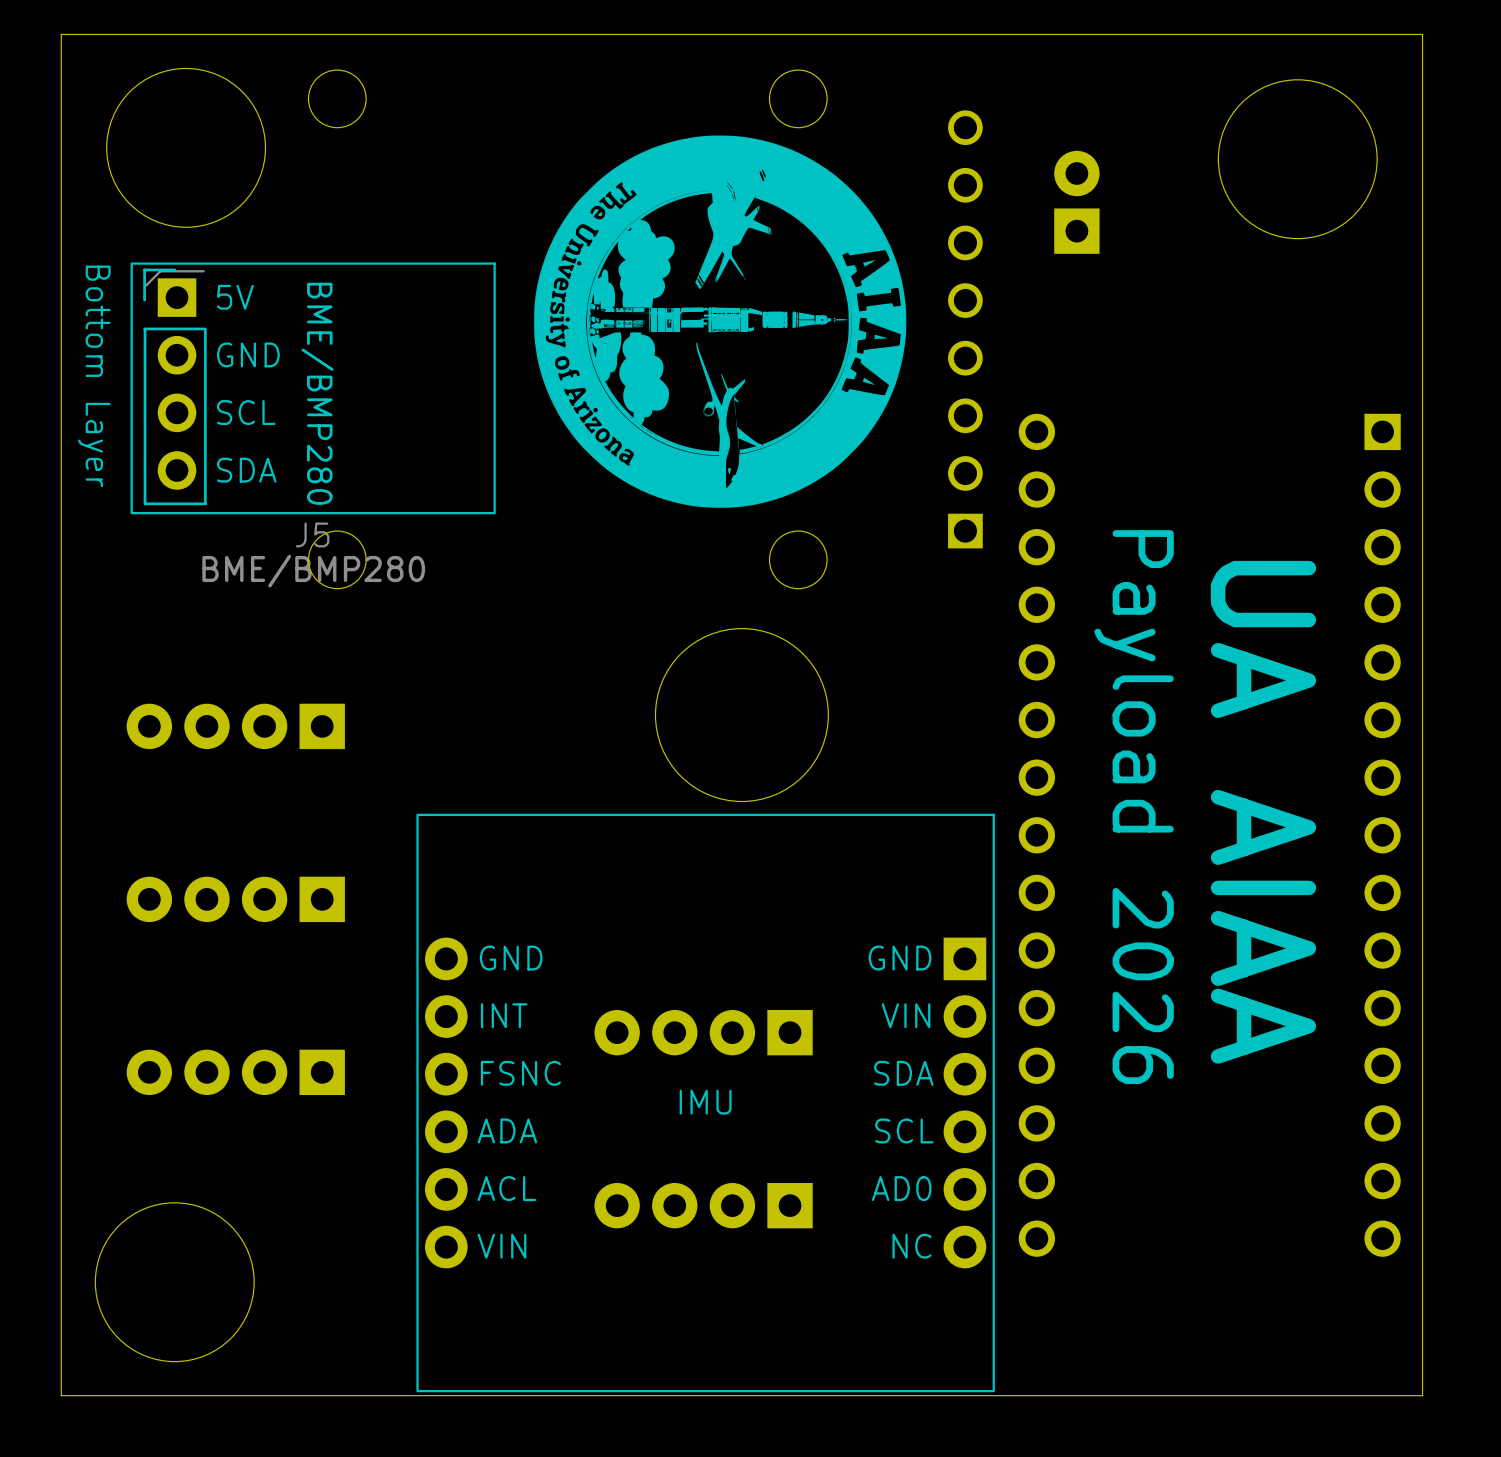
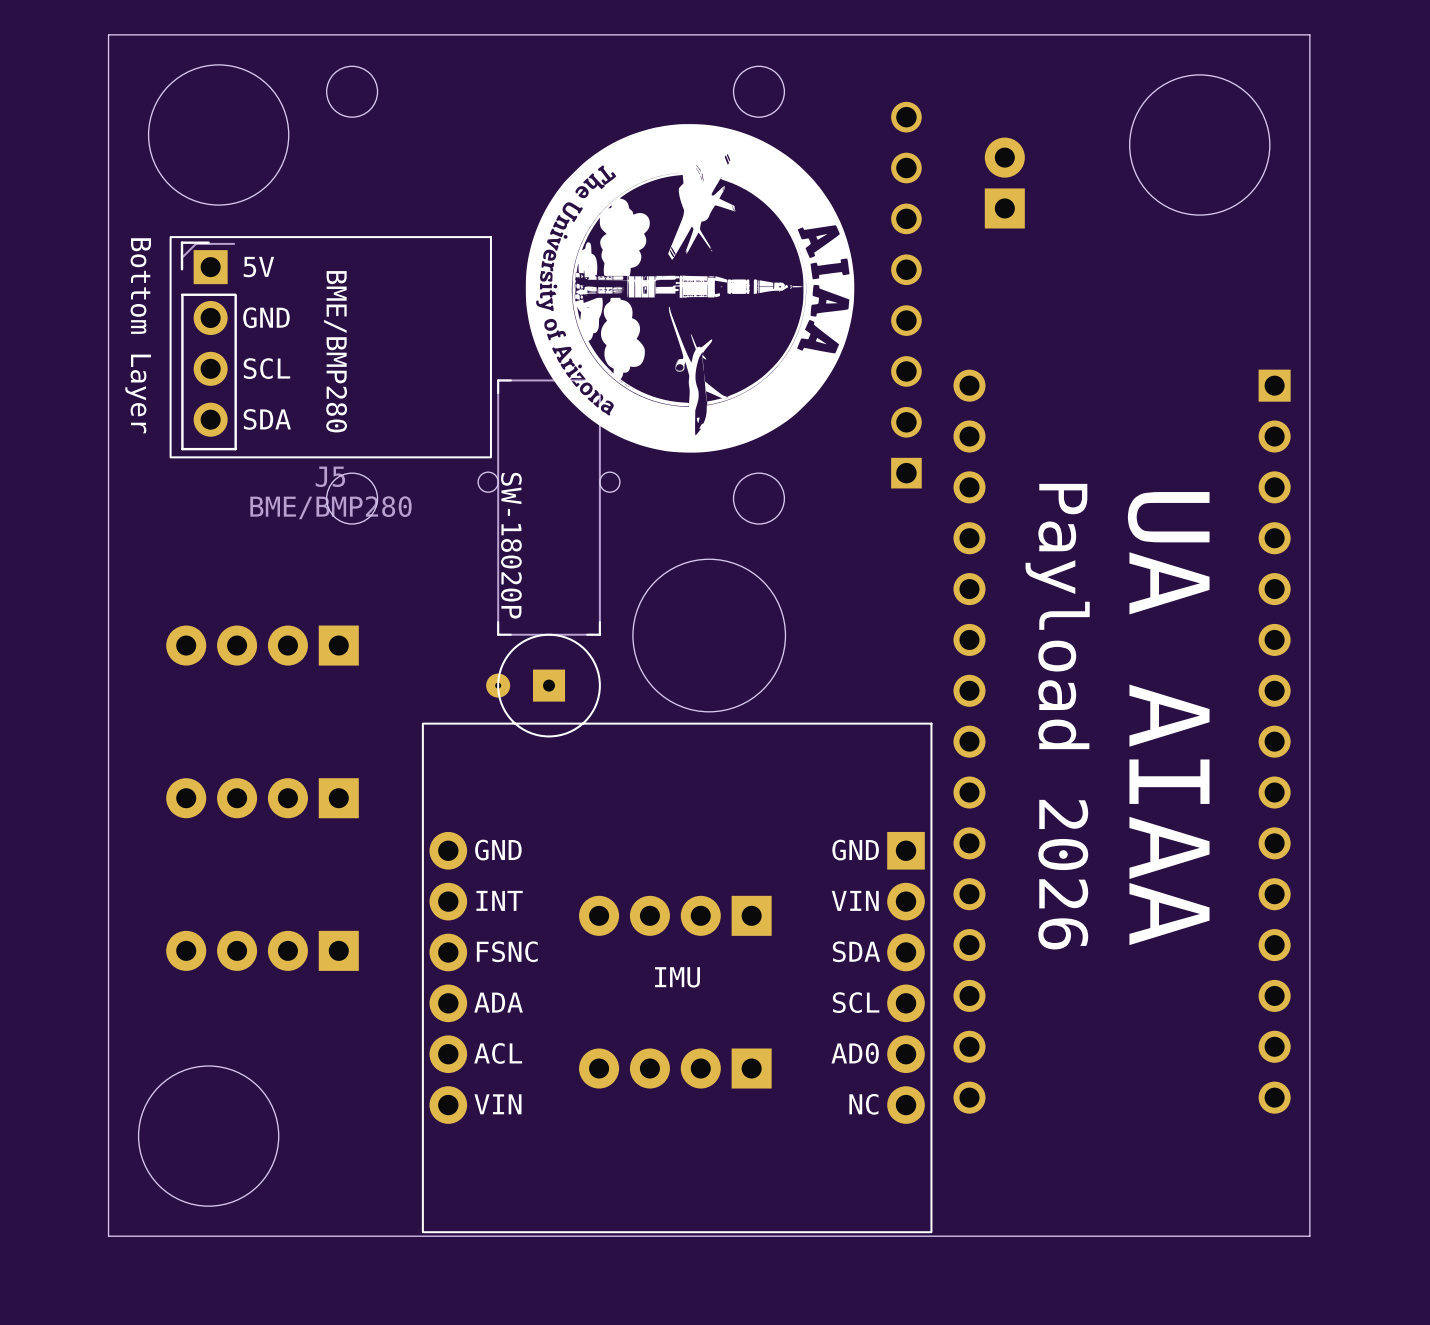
drawing: none -> [501, 472, 522, 619]
part: none -> (549, 558)

